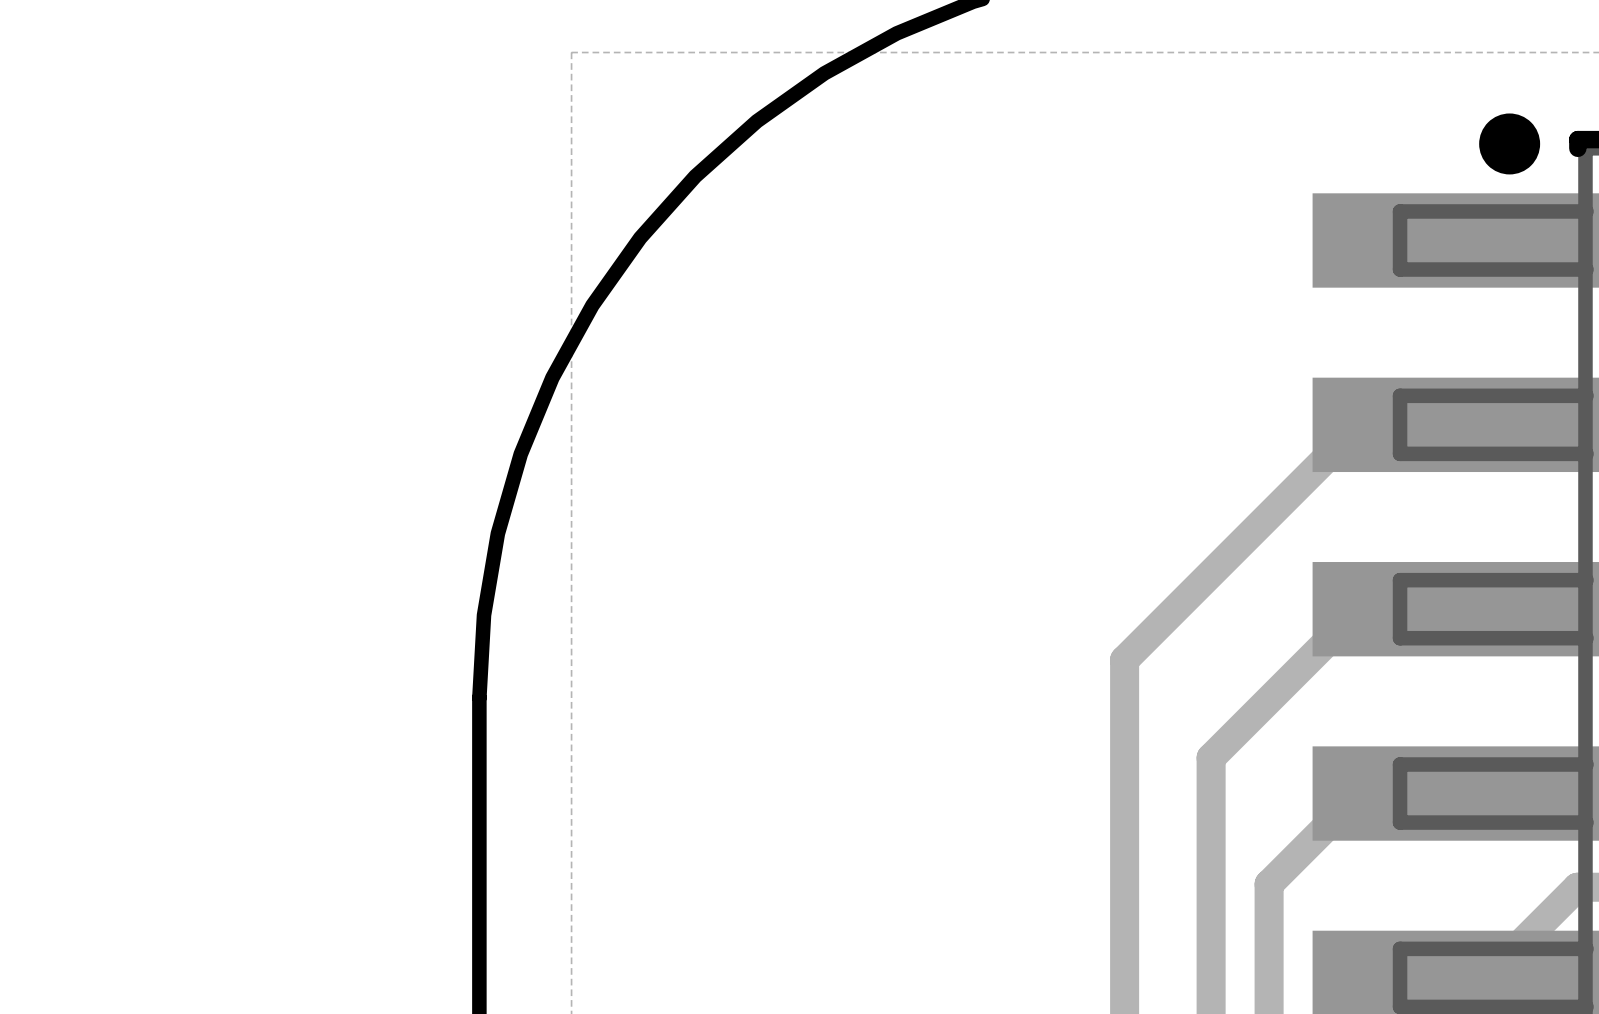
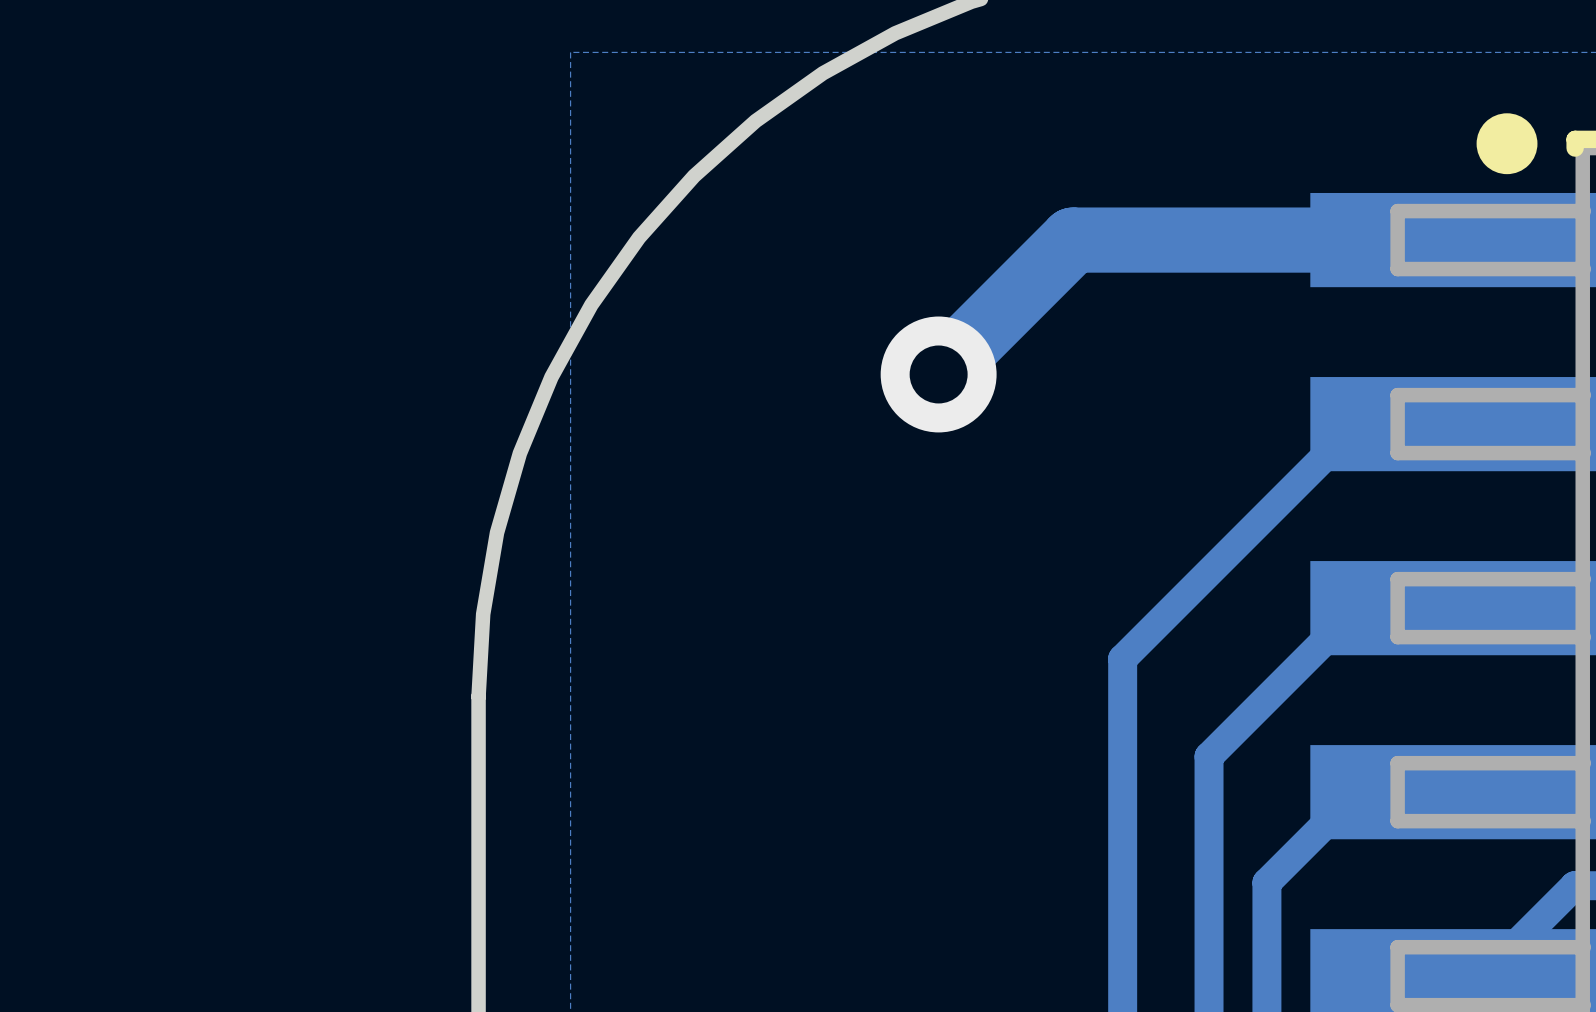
track: none -> (1484, 240) (1073, 240) (938, 374)
via: none -> (938, 374)

